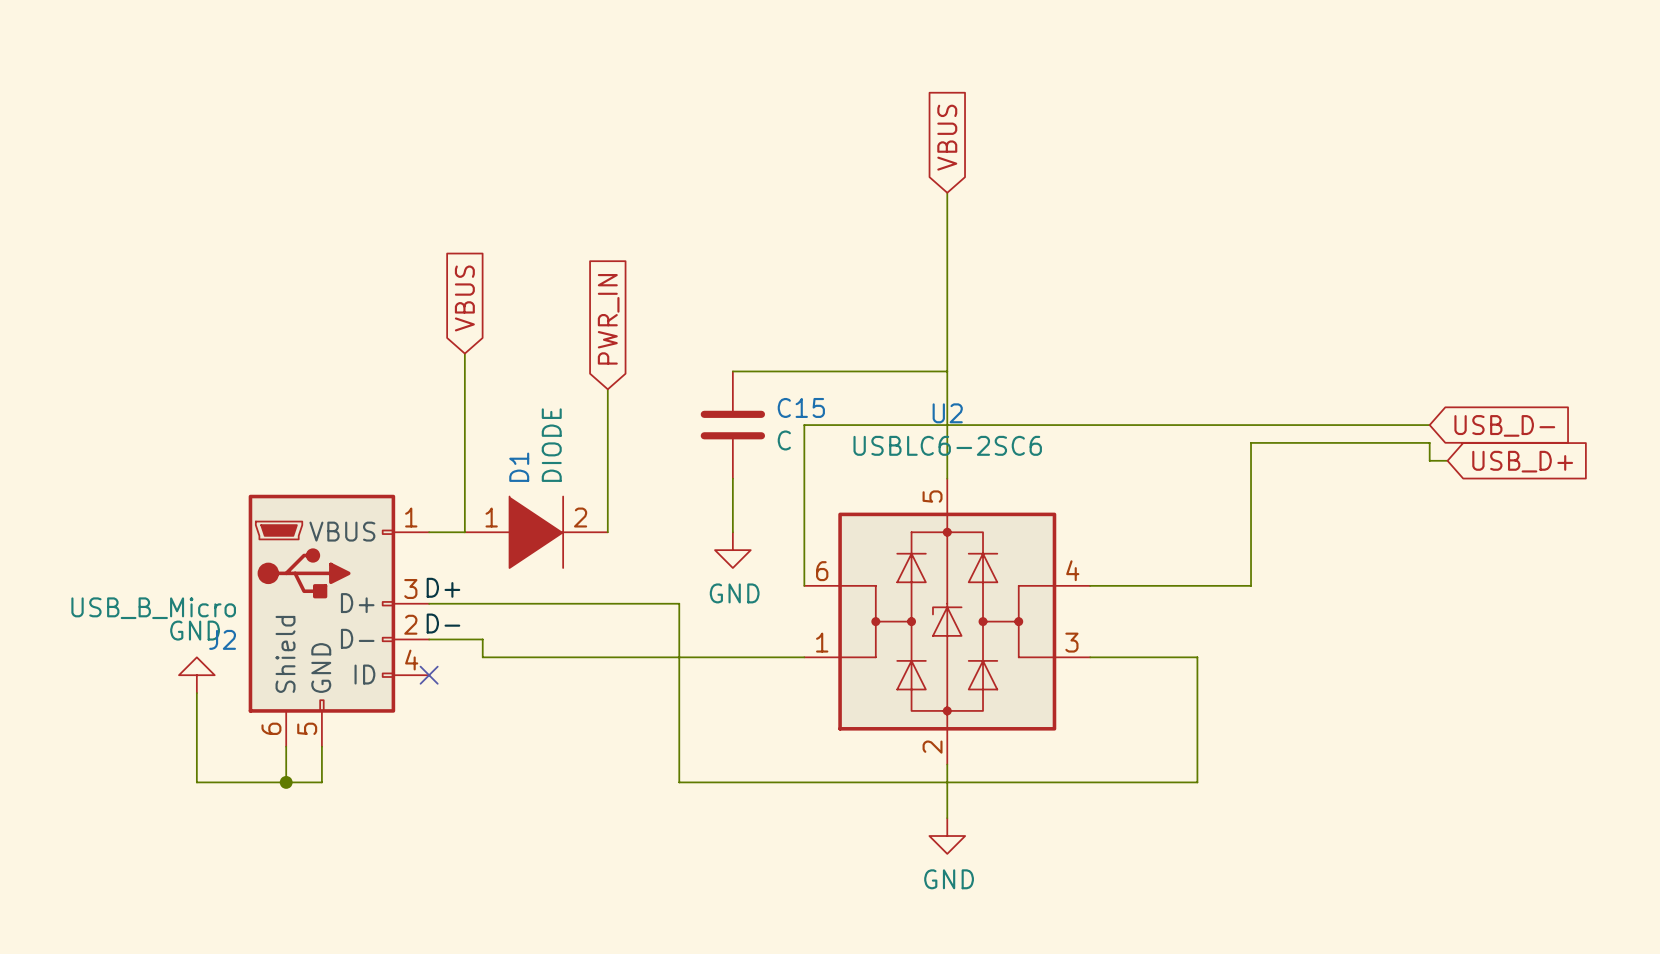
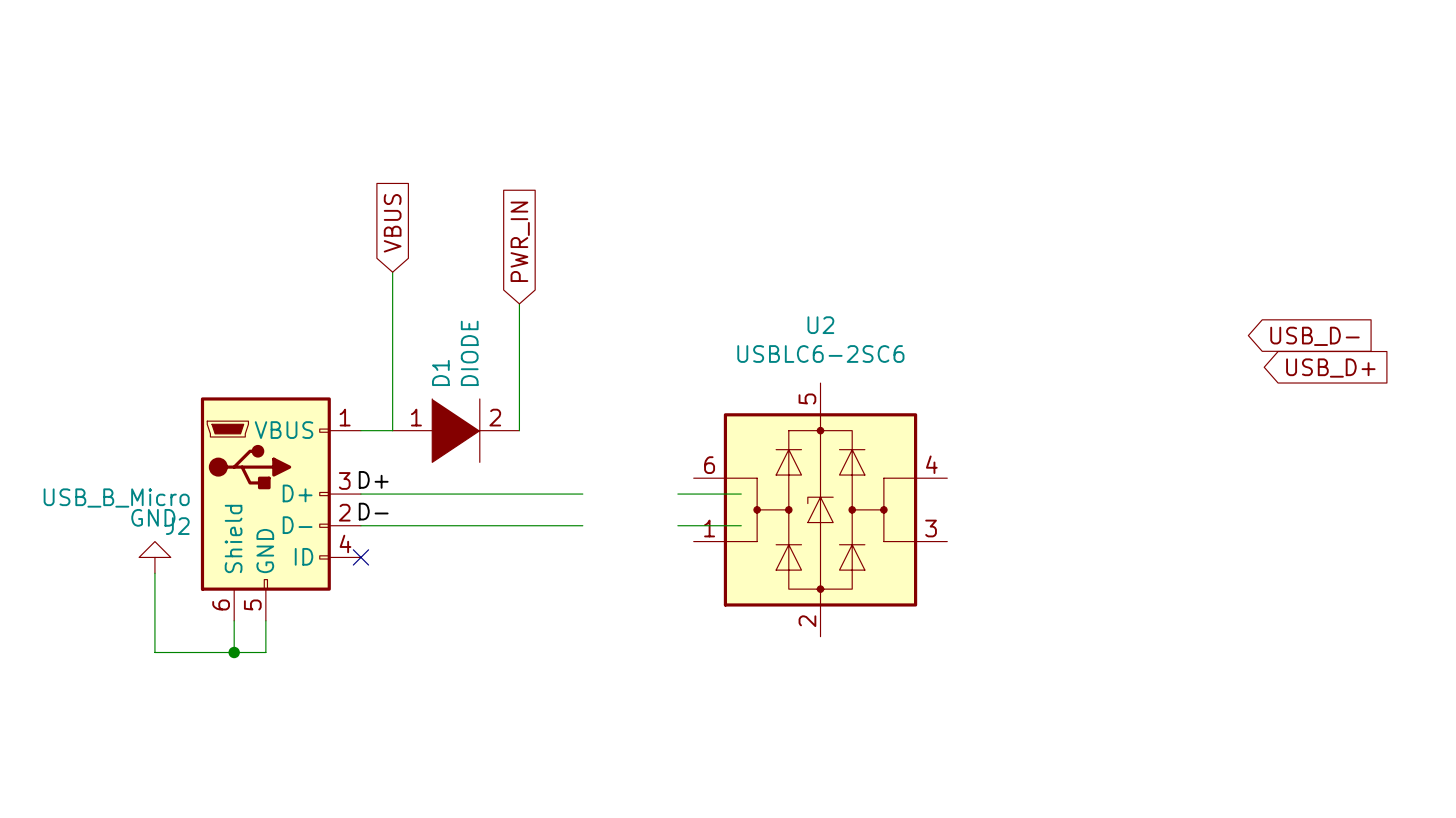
global label: VBUS (947, 137) -> none
wire: (947, 192) (947, 478) -> none
wire: (732, 371) (947, 371) -> none
C15: C (732, 425) -> none
wire: (1429, 425) (804, 425) (804, 585) -> none
wire: (1447, 460) (1429, 460) (1429, 442) (1251, 442) (1251, 585) (1090, 585) -> none
wire: (732, 478) (732, 532) -> none
power symbol: GND (732, 550) -> none
wire: (679, 603) (679, 782) (1197, 782) (1197, 657) (1090, 657) -> none
wire: none -> (677, 494) (741, 494)
wire: (482, 639) (482, 657) (804, 657) -> (408, 525) (582, 525)
wire: none -> (677, 525) (741, 525)
wire: (947, 764) (947, 818) -> none
power symbol: GND (947, 836) -> none

